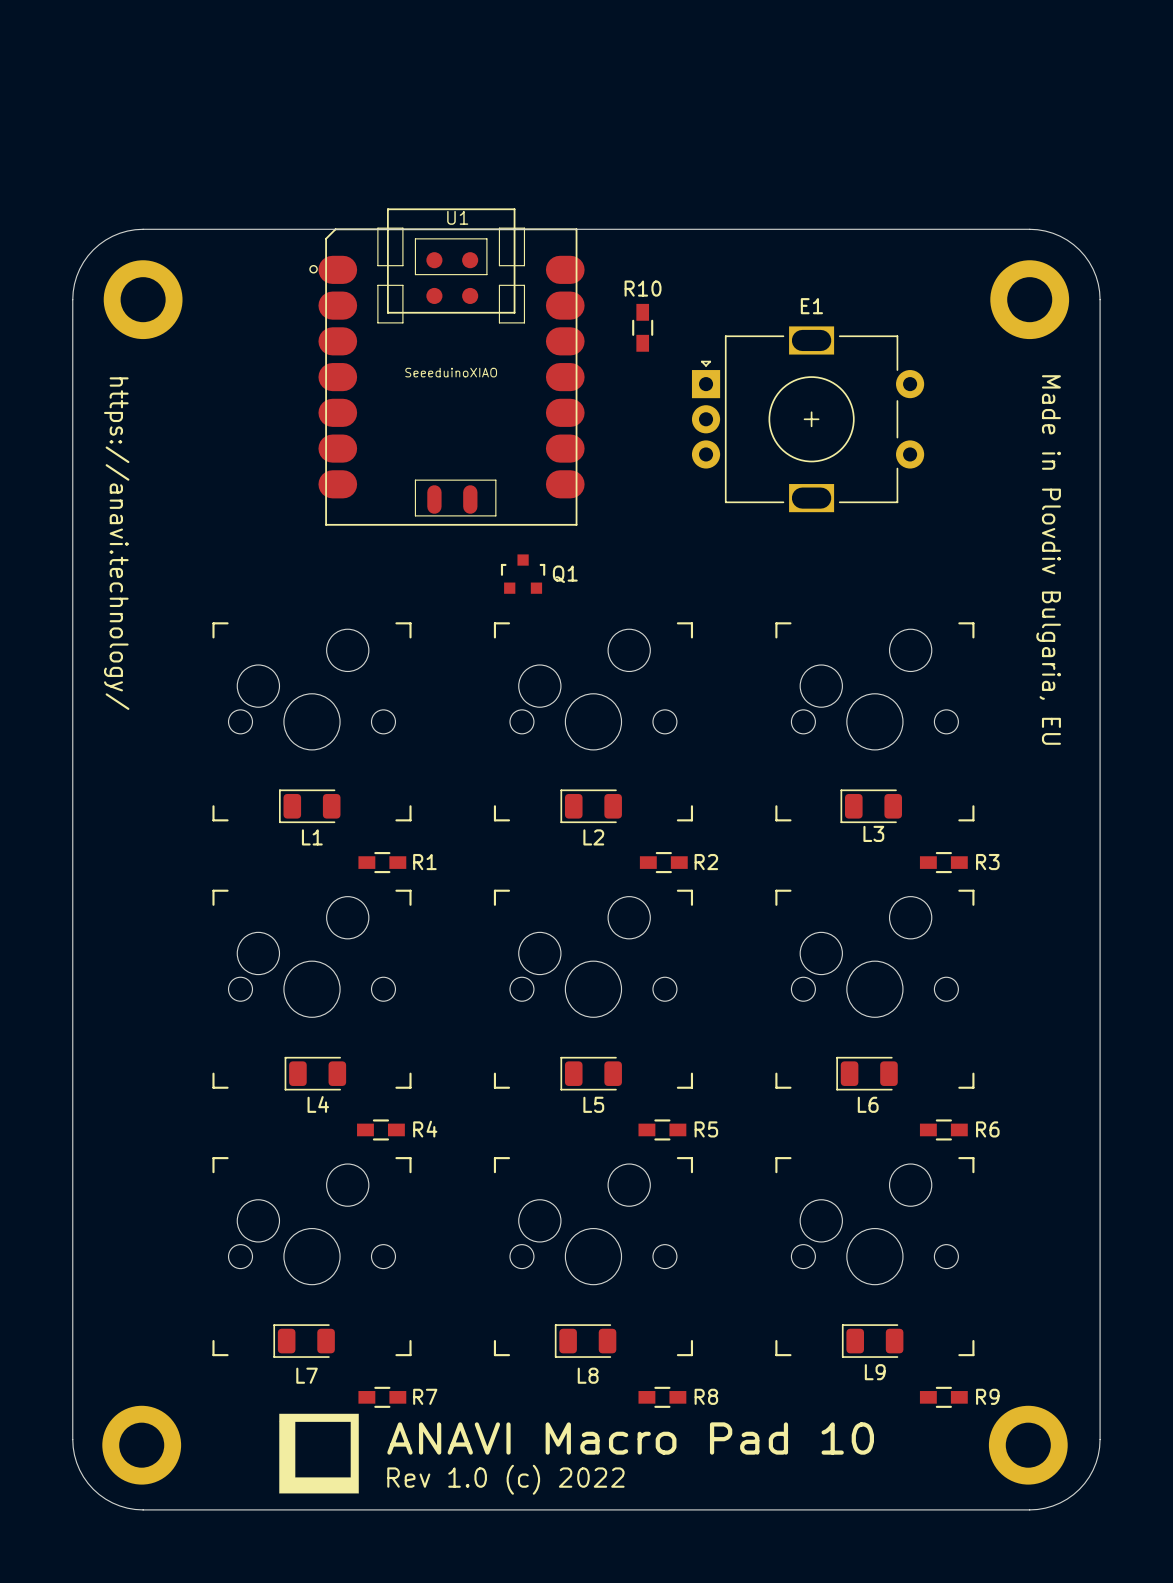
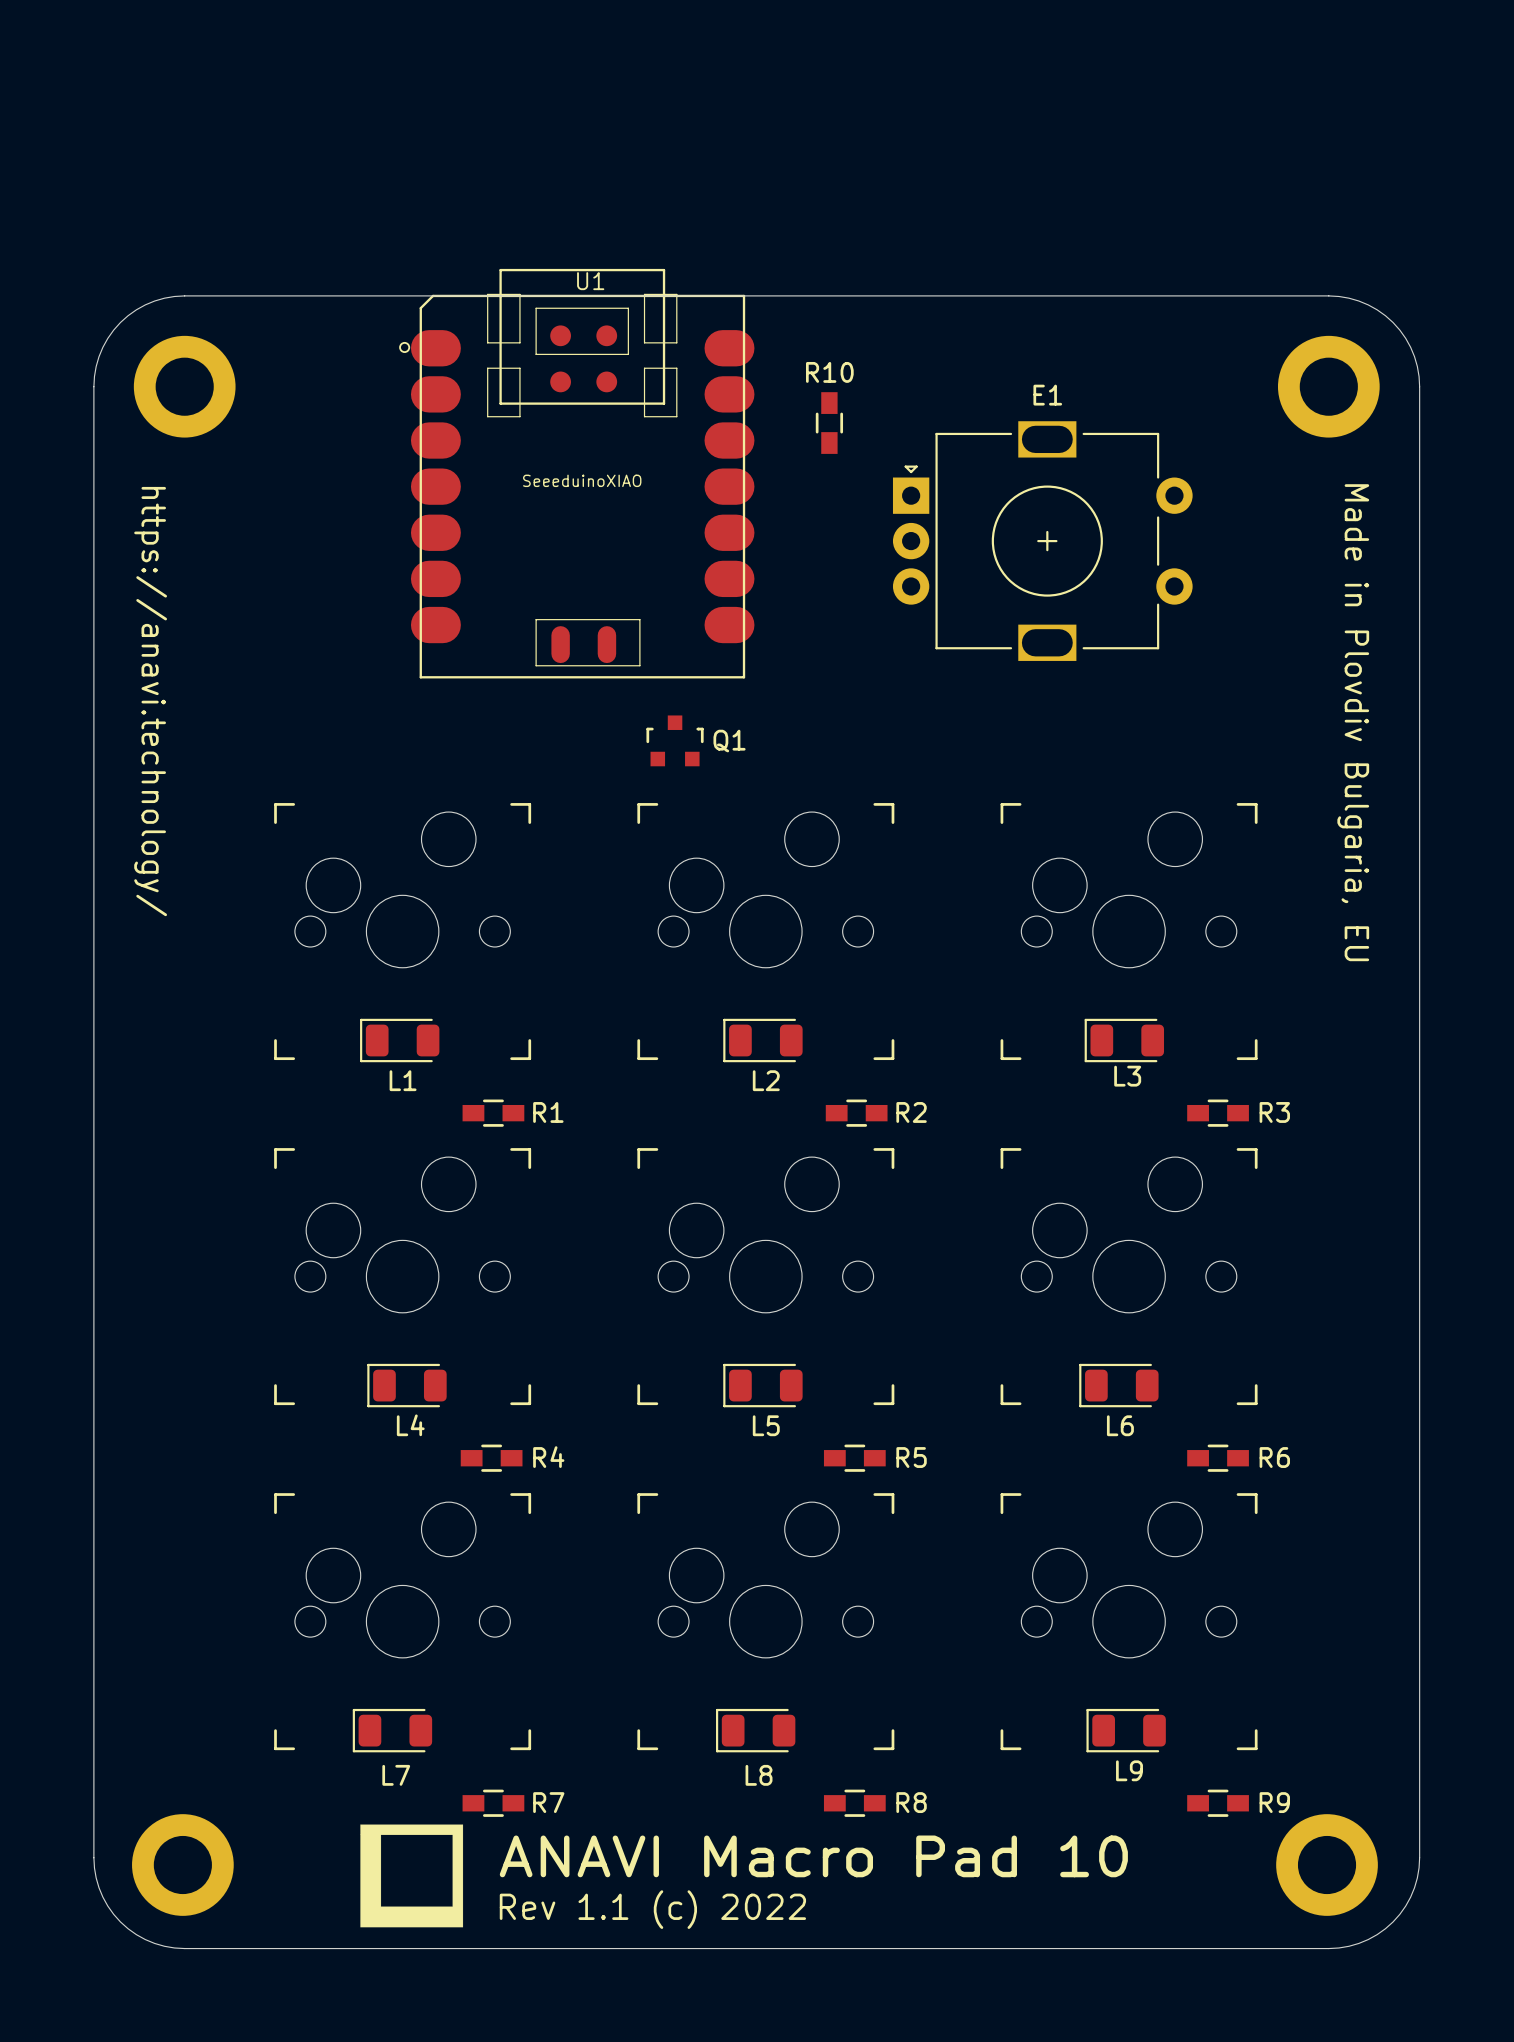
text: Rev 1.0 (c) 2022 (505, 1479) -> Rev 1.1 (c) 2022 (652, 1909)

